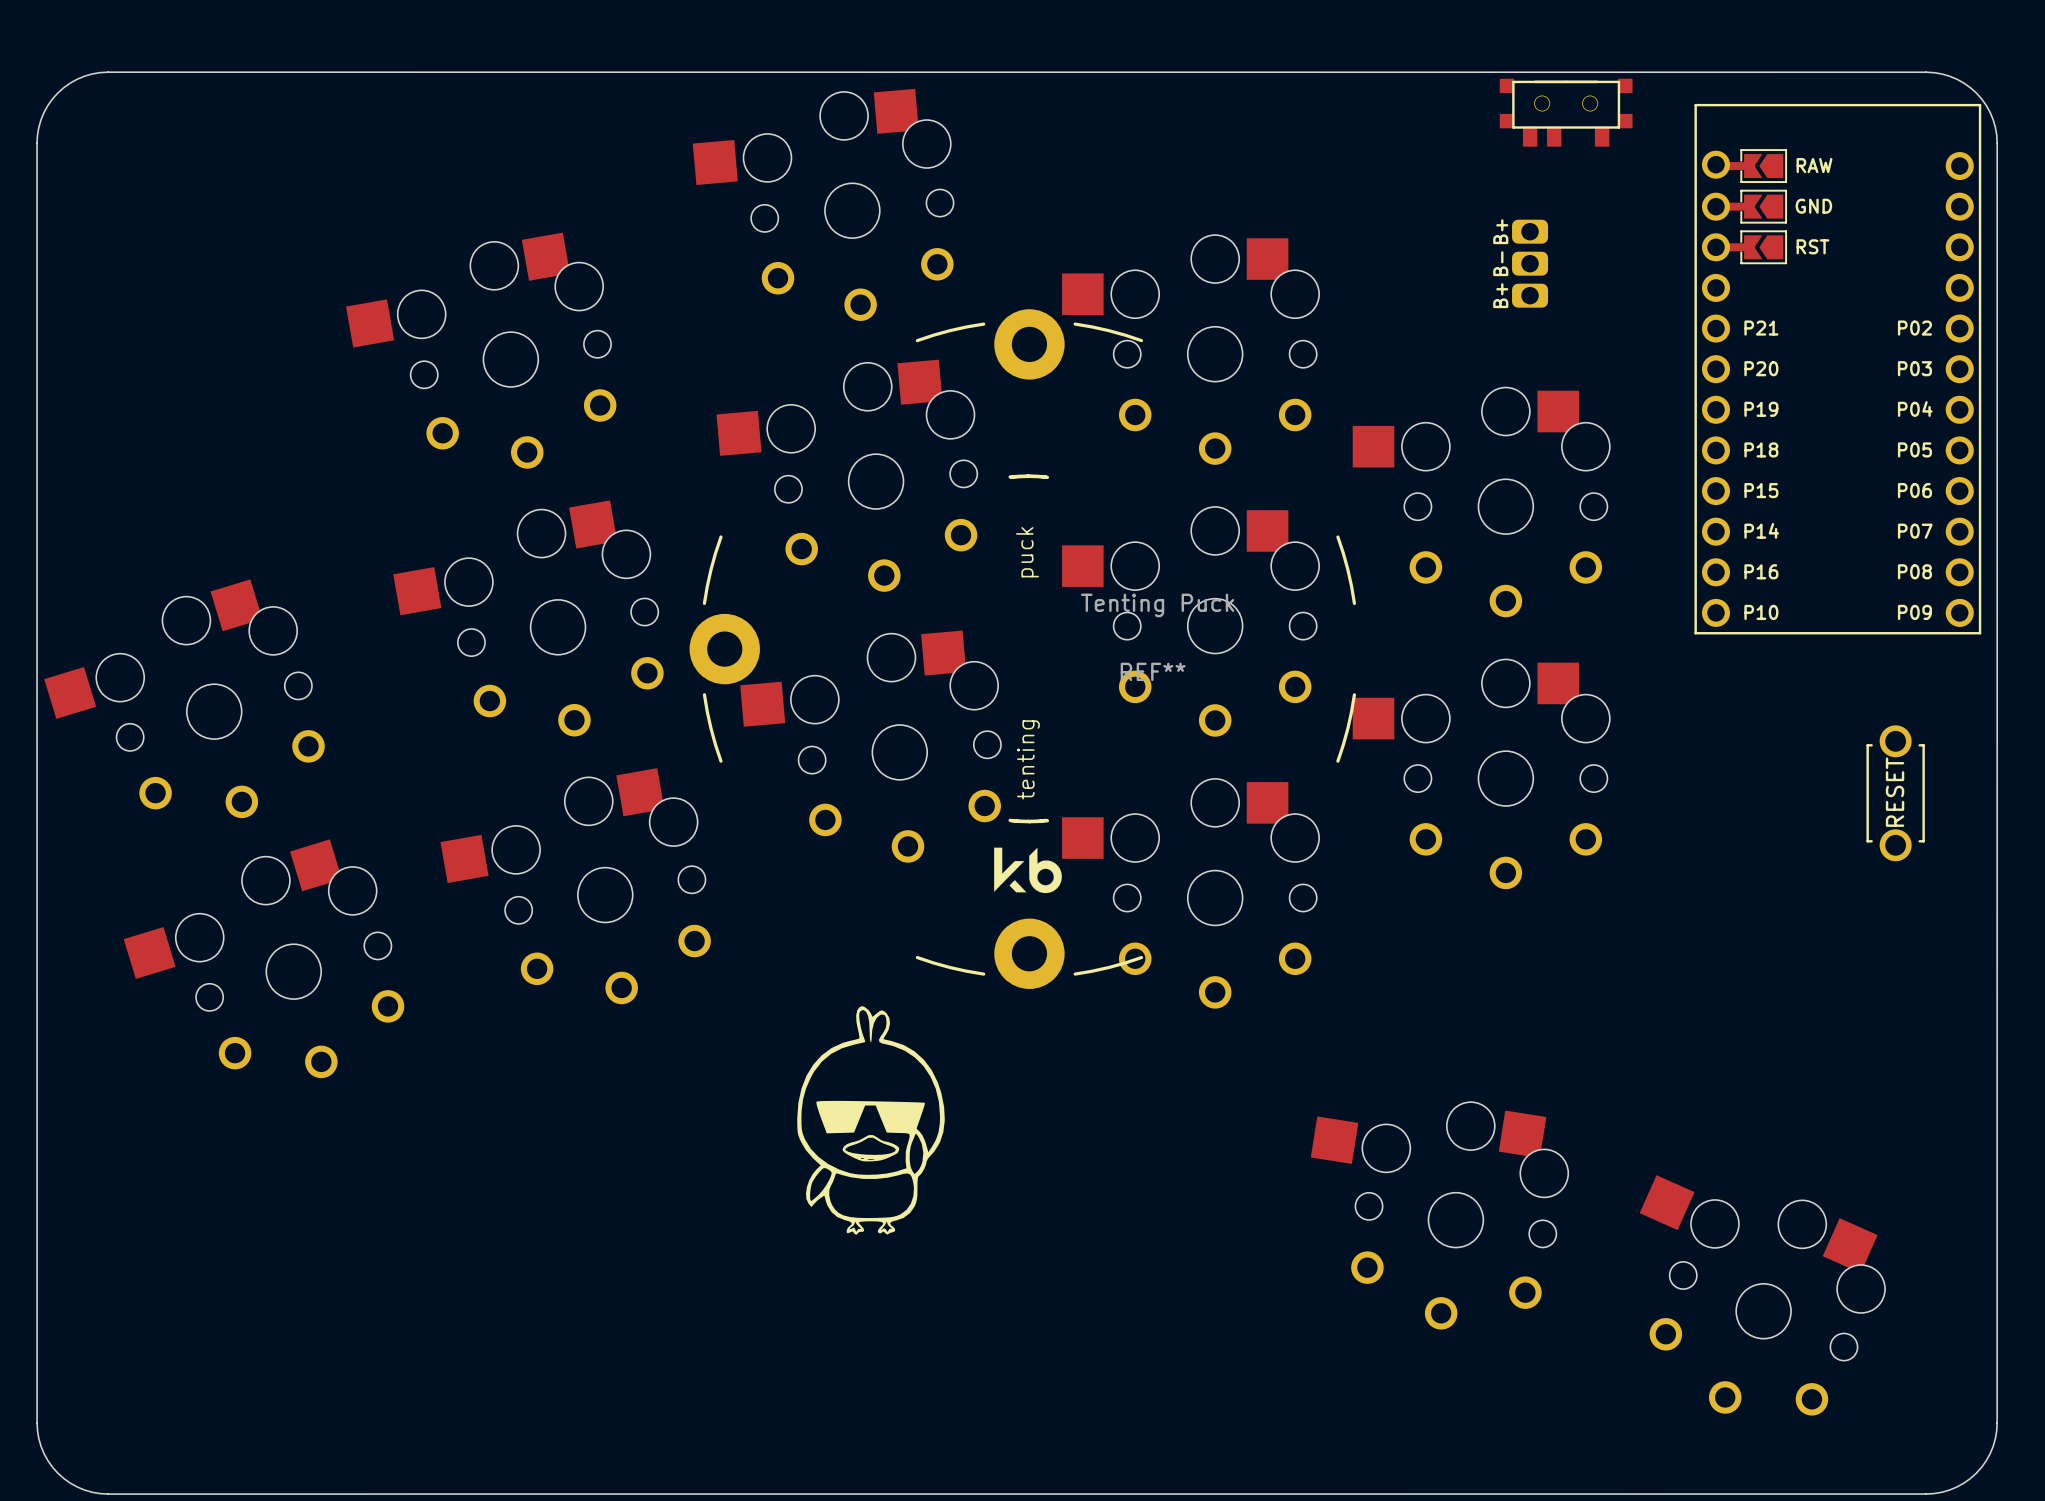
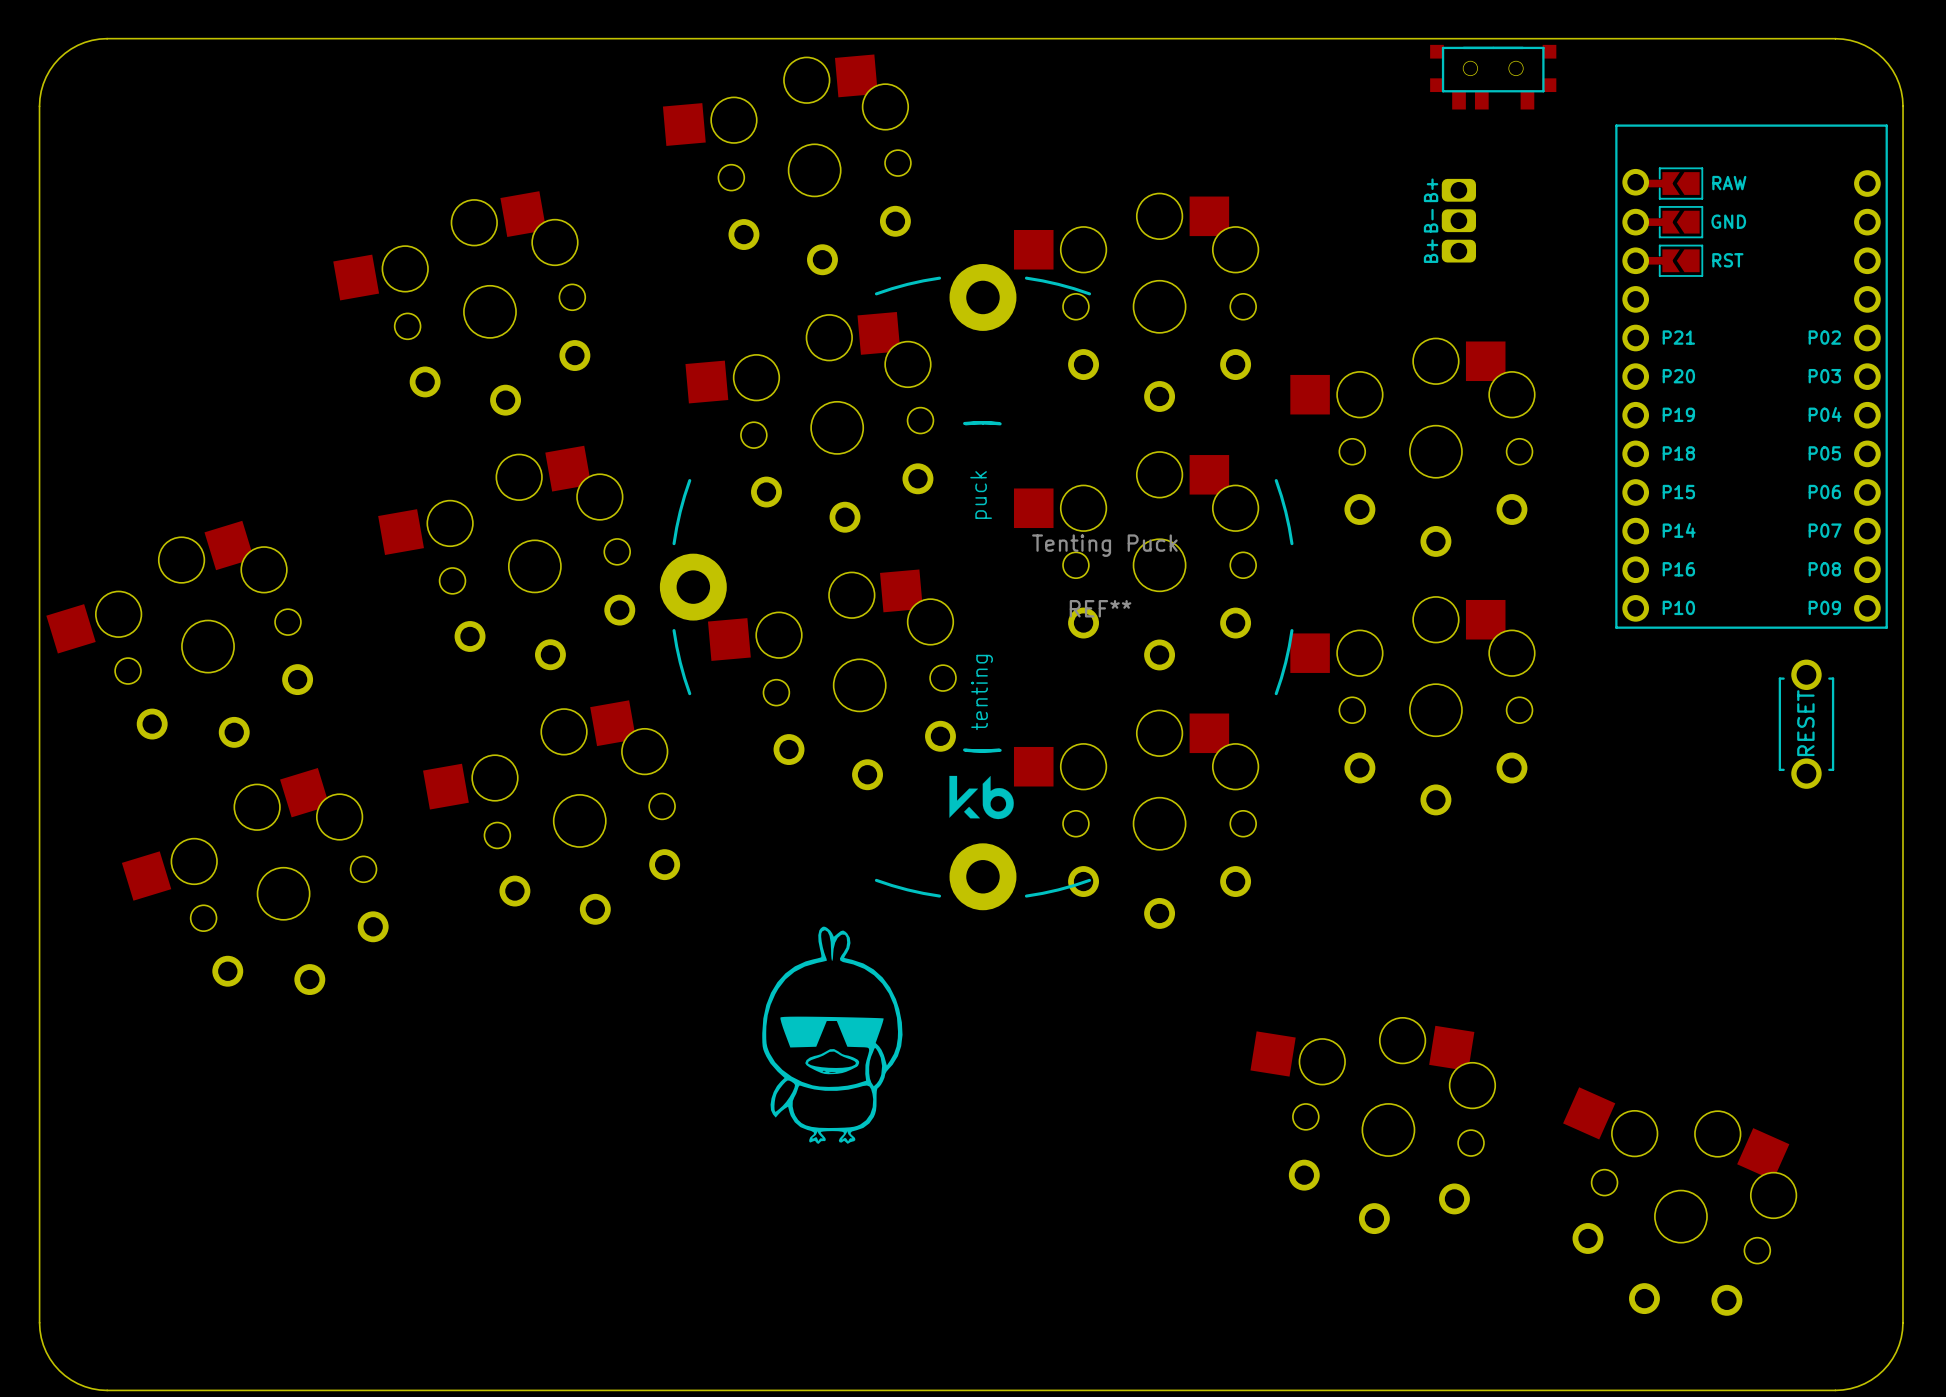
part position: (1837, 369) -> (1751, 376)

